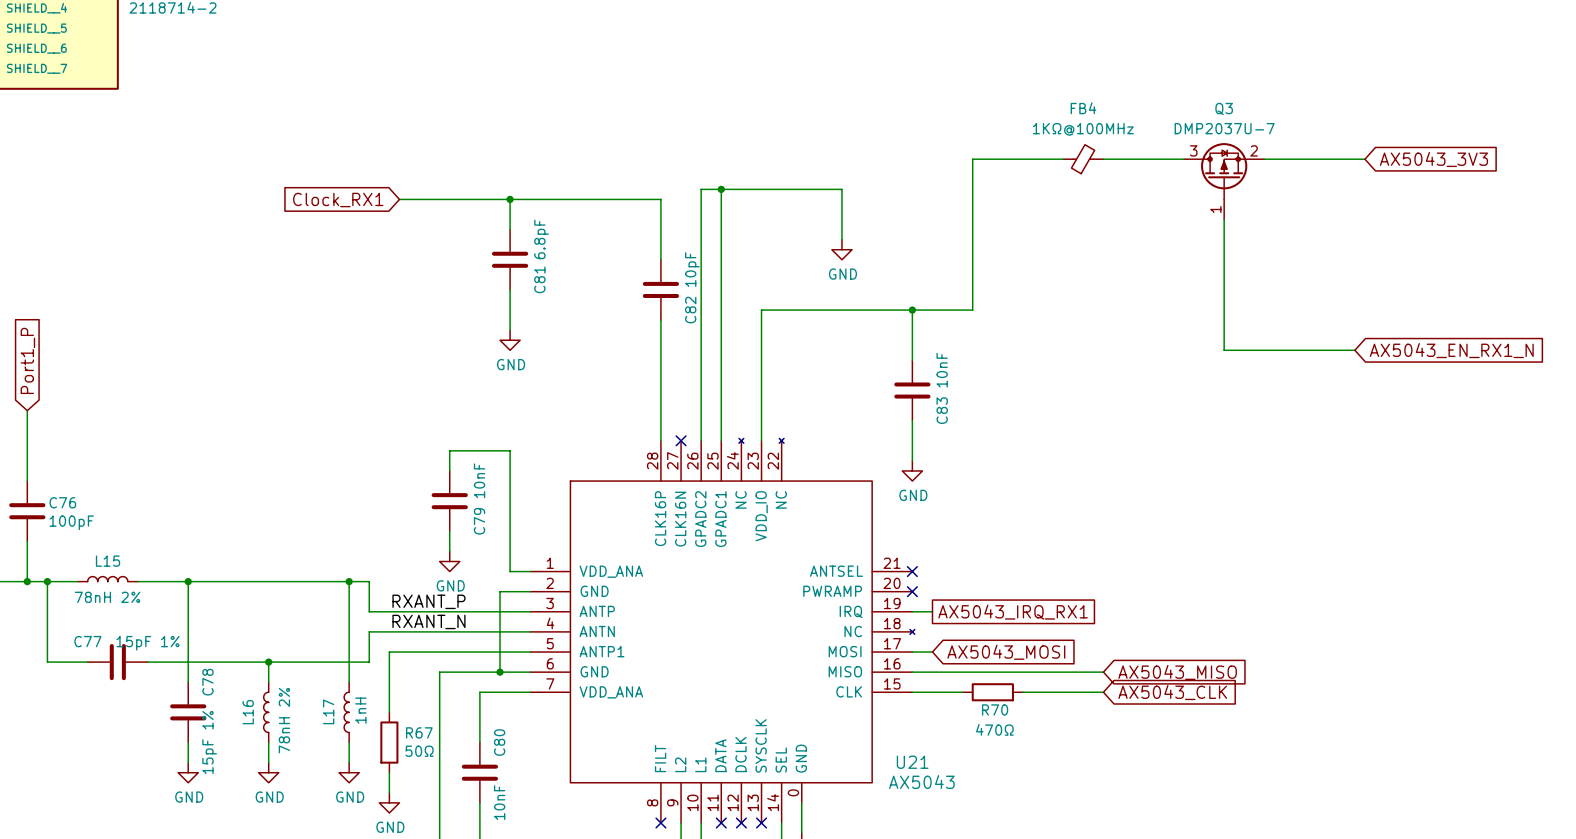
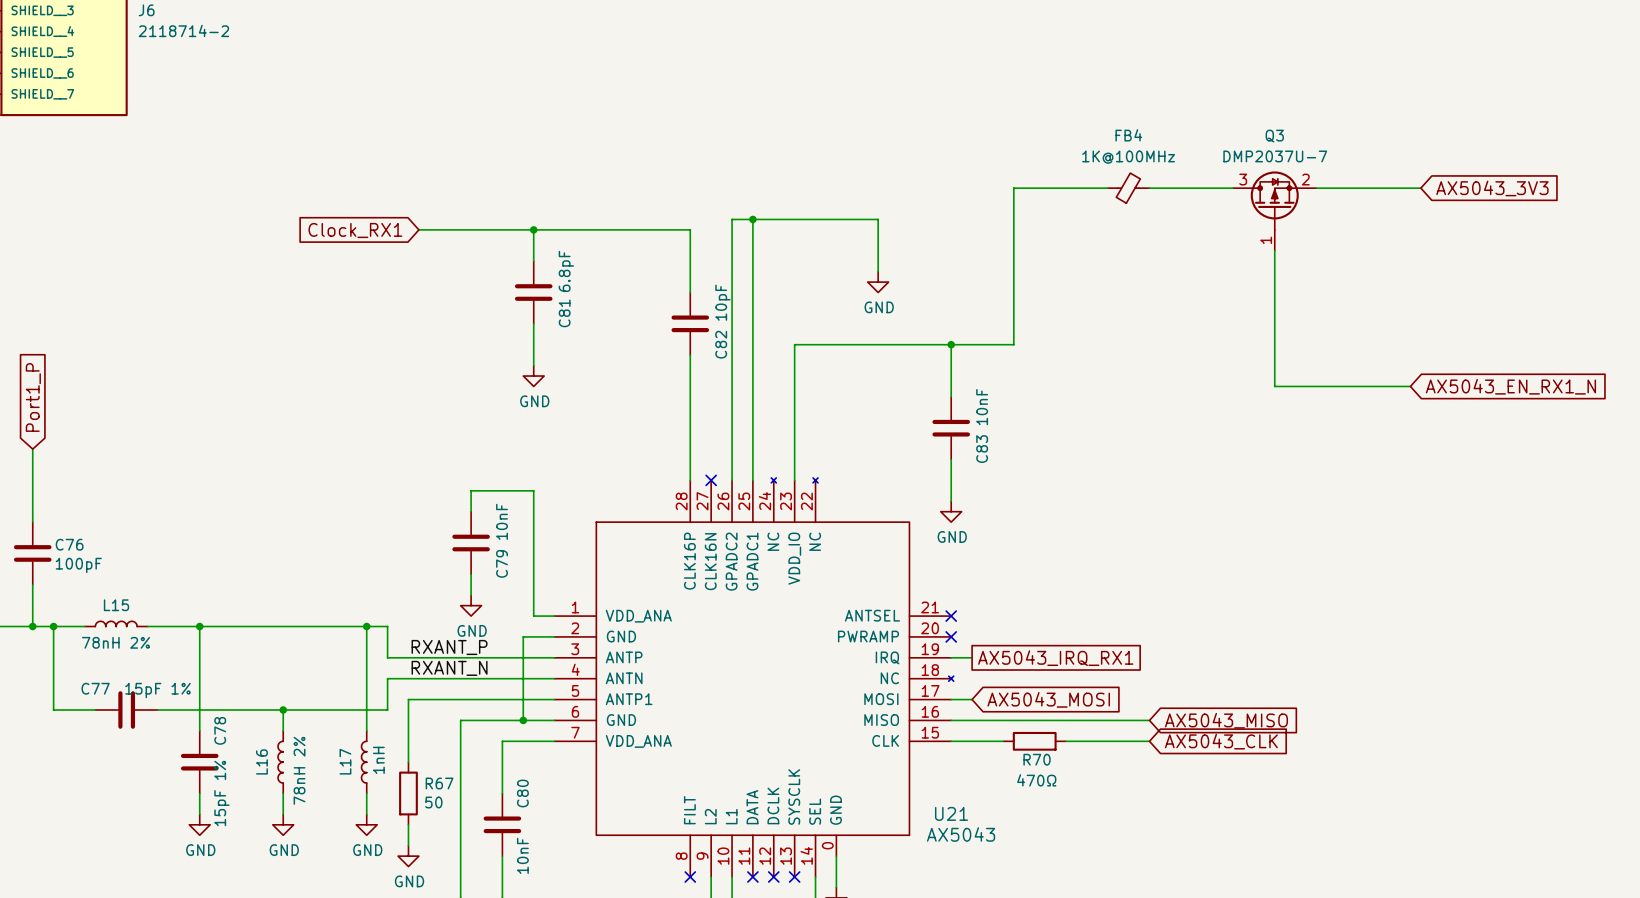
FB4 value: 1KΩ@100MHz (1083, 129) -> 1K@100MHz (1128, 157)
R67 value: 50Ω (419, 751) -> 50 (433, 802)

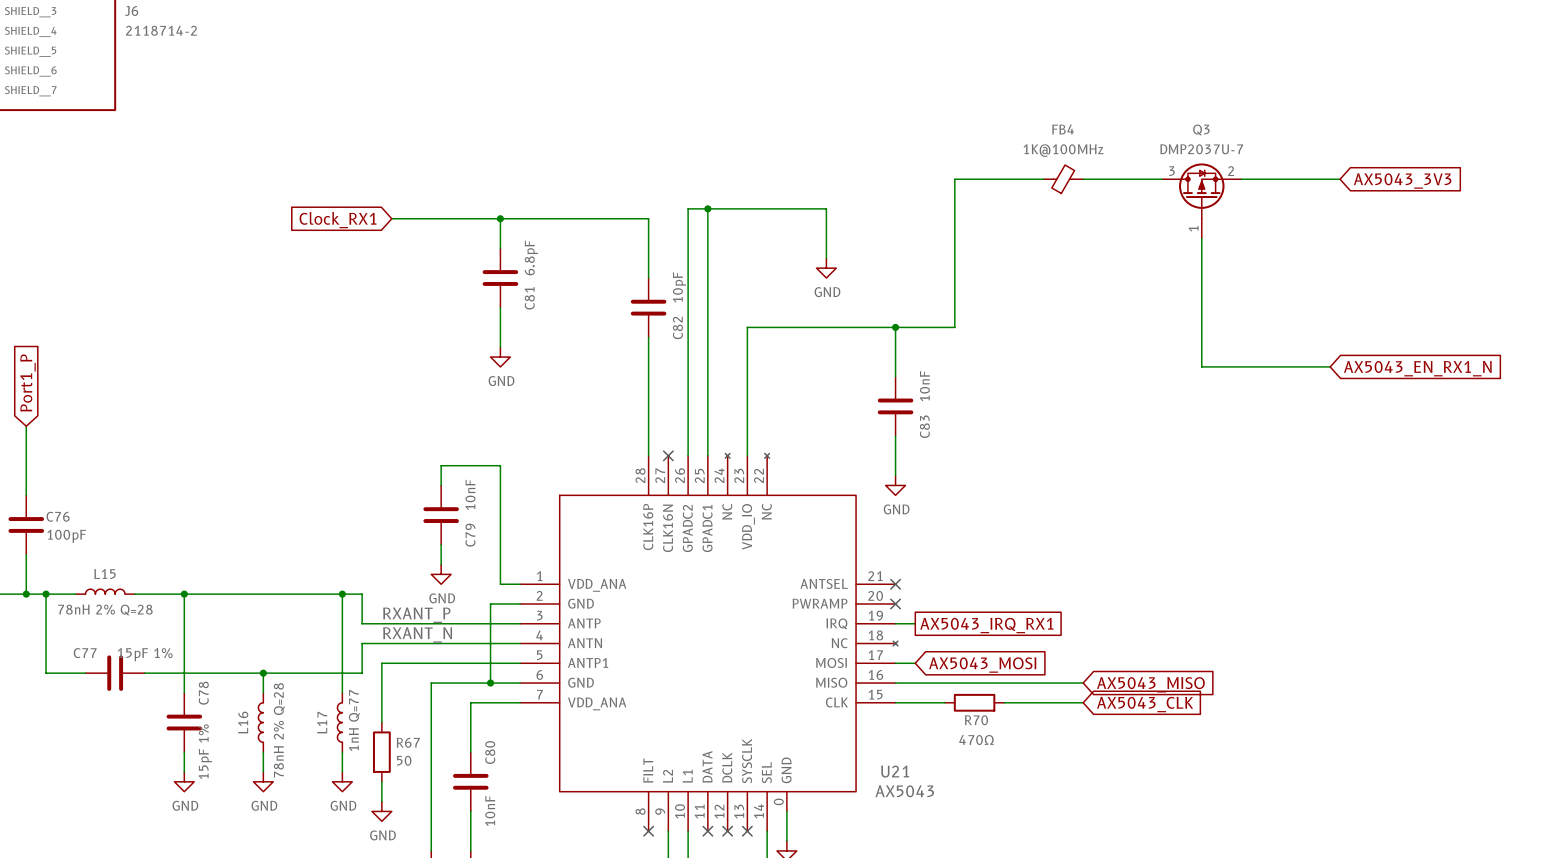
L15 value: 78nH 2% (115, 642) -> 78nH 2% Q=28 (105, 610)
L17 value: 1nH (378, 760) -> 1nH Q=77 (354, 720)
L16 value: 78nH 2% (299, 770) -> 78nH 2% Q=28 (279, 730)

